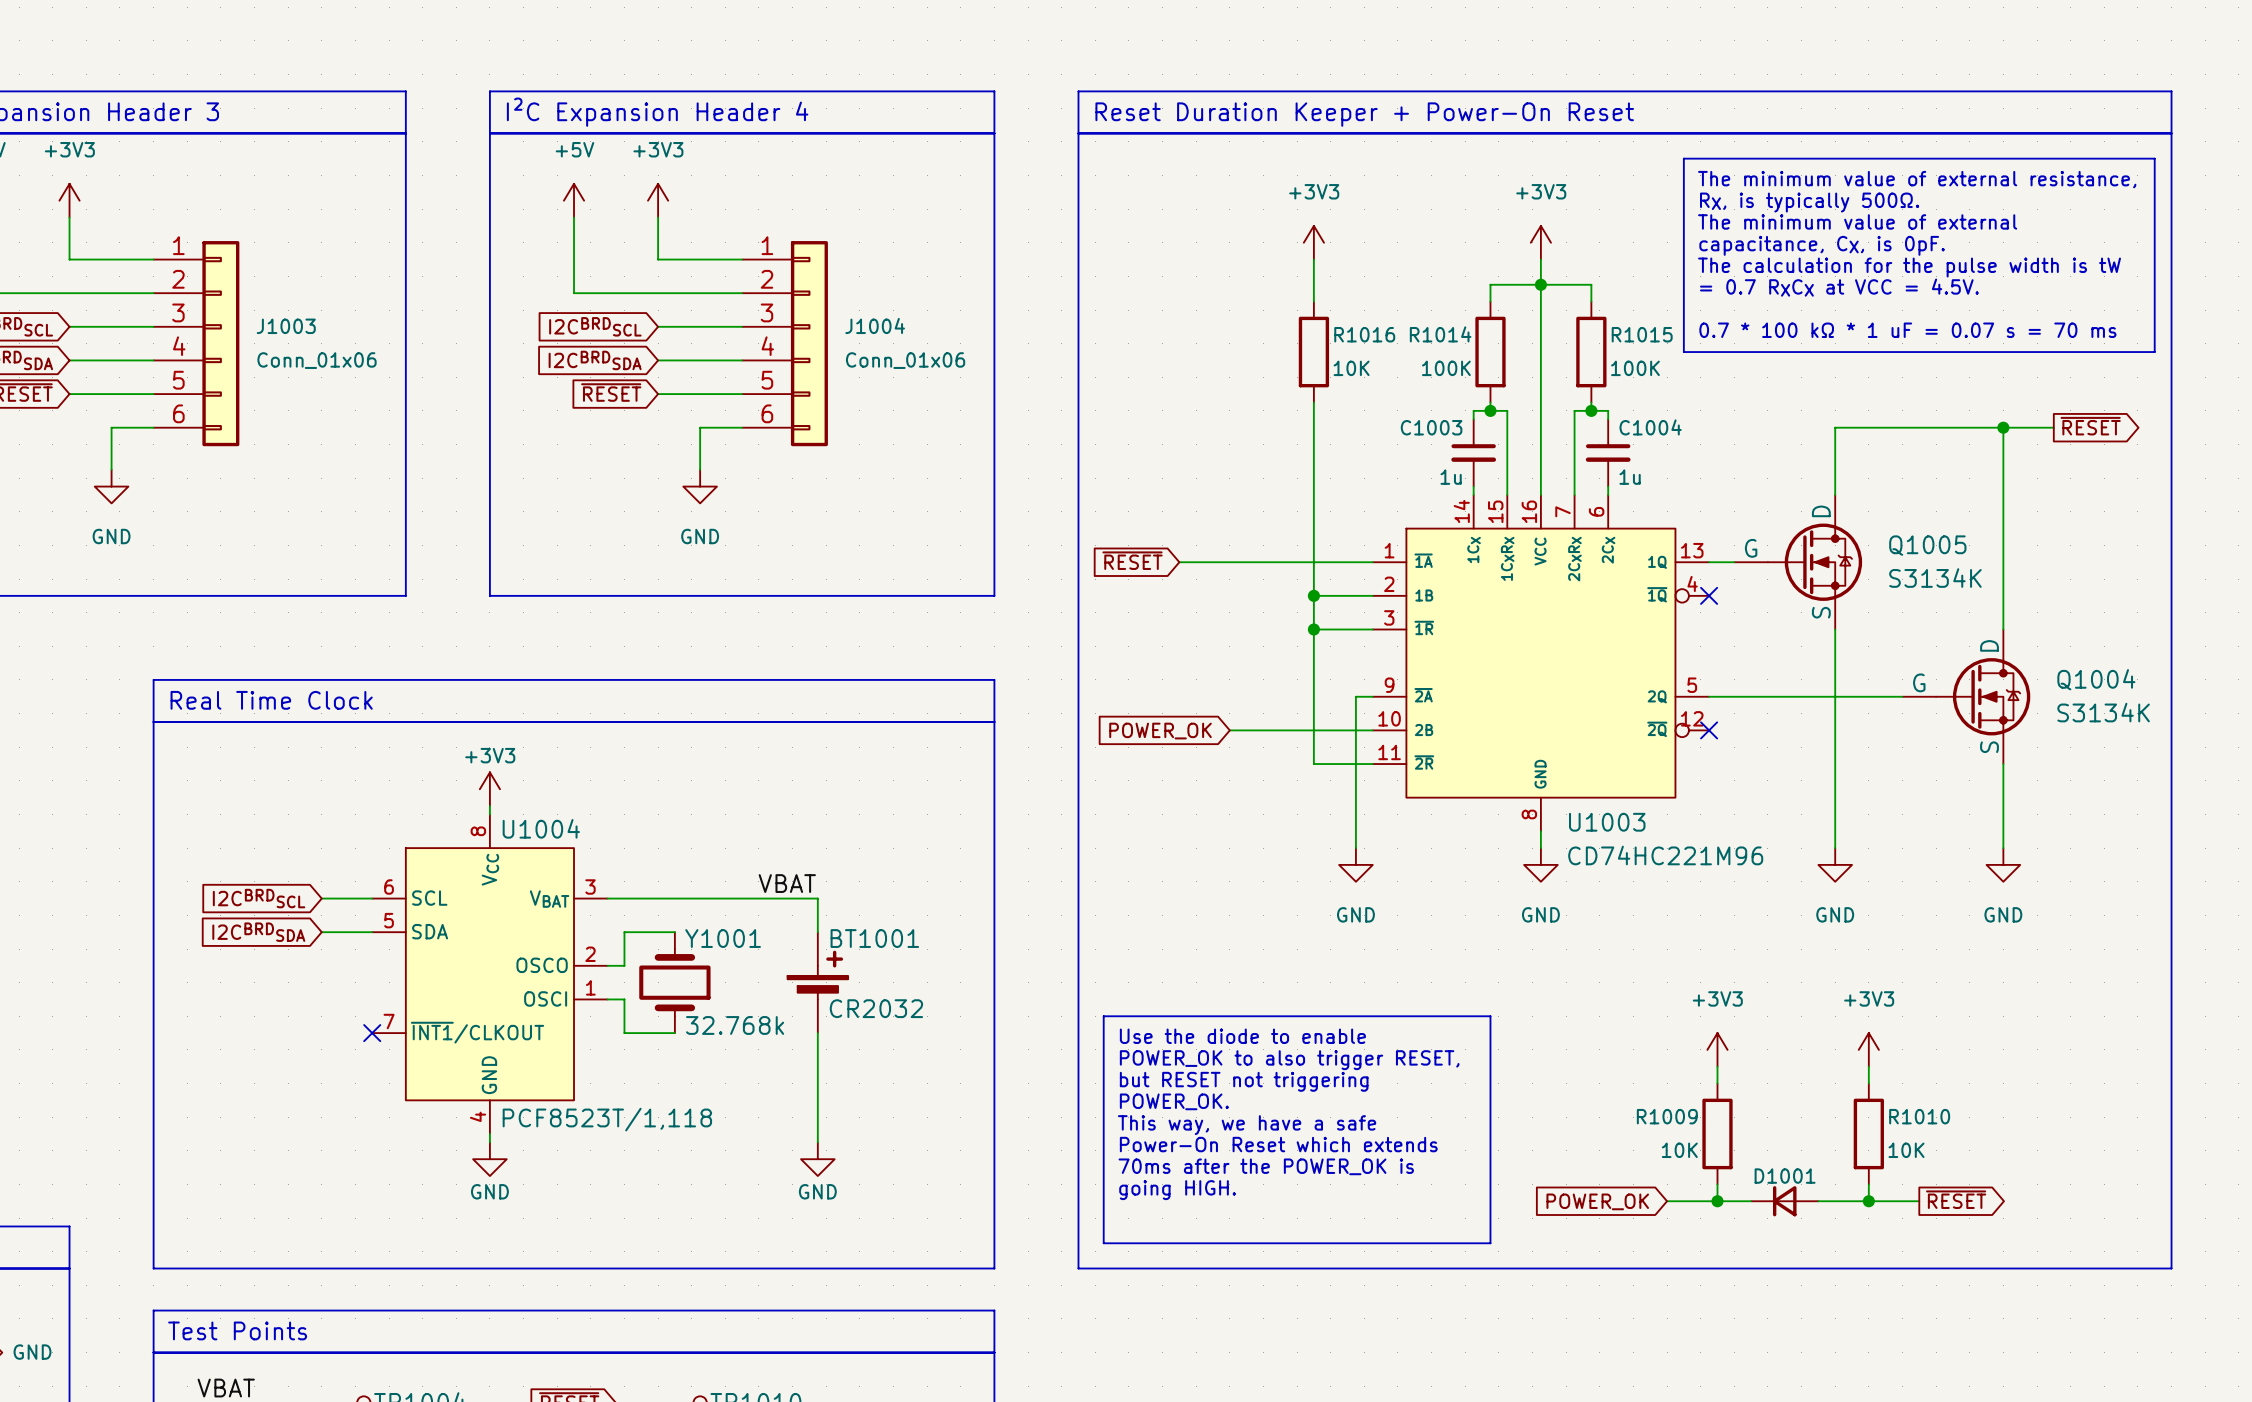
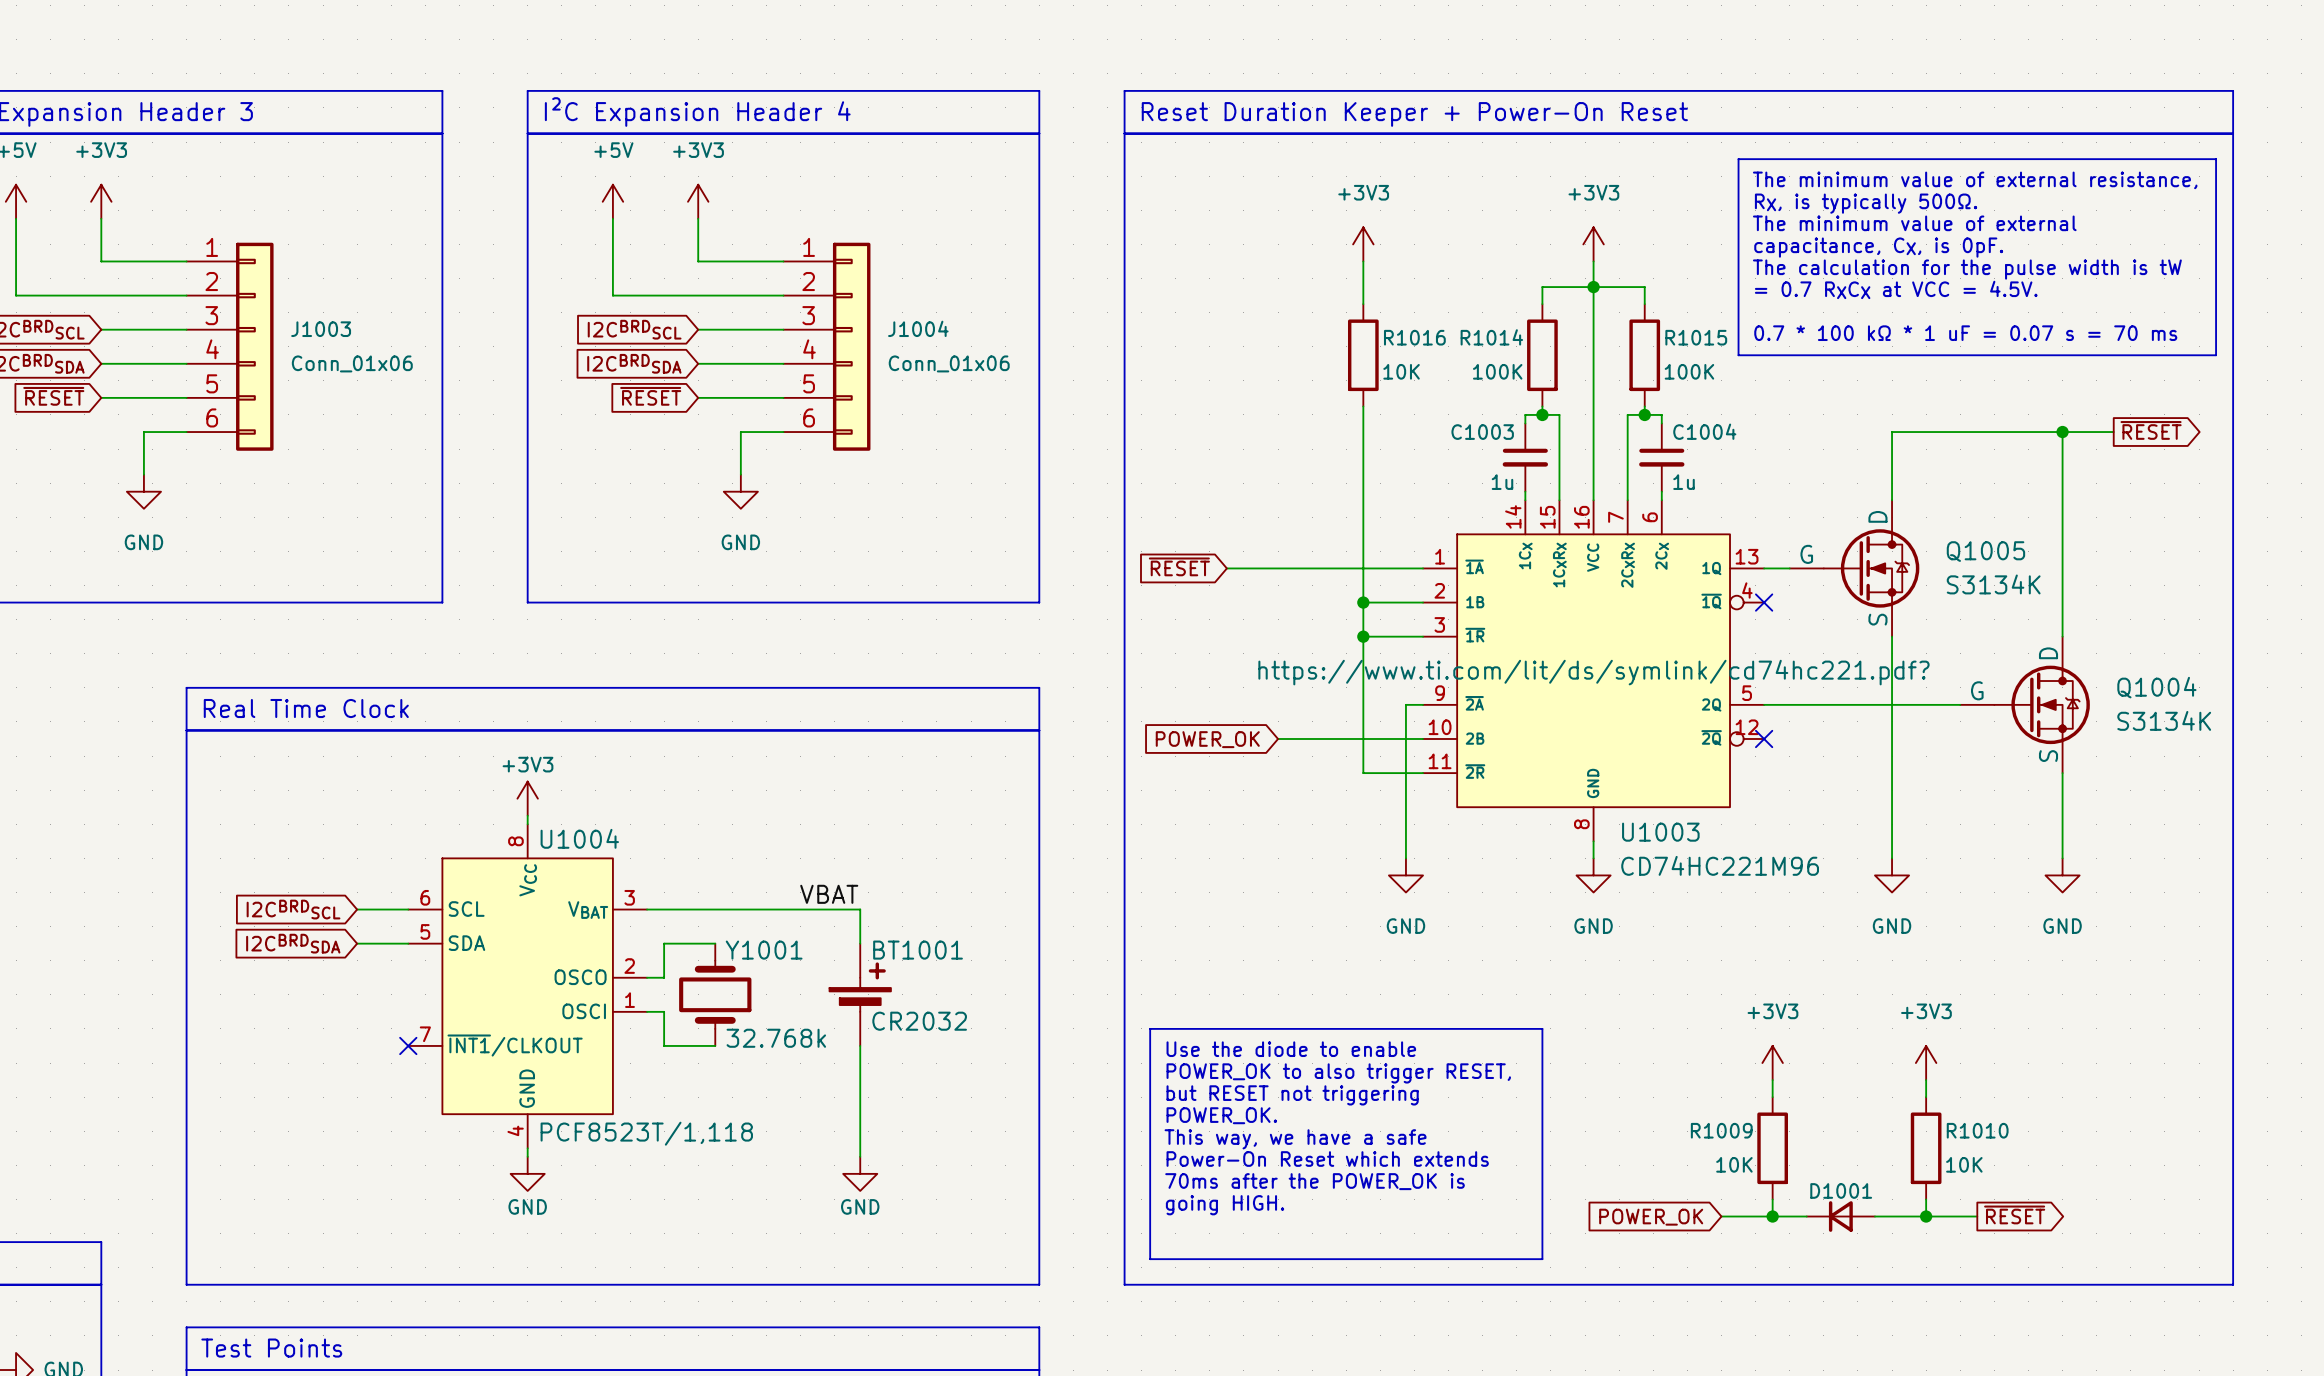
U1003 text: none -> https://www.ti.com/lit/ds/symlink/cd74hc221.pdf? (1593, 672)

